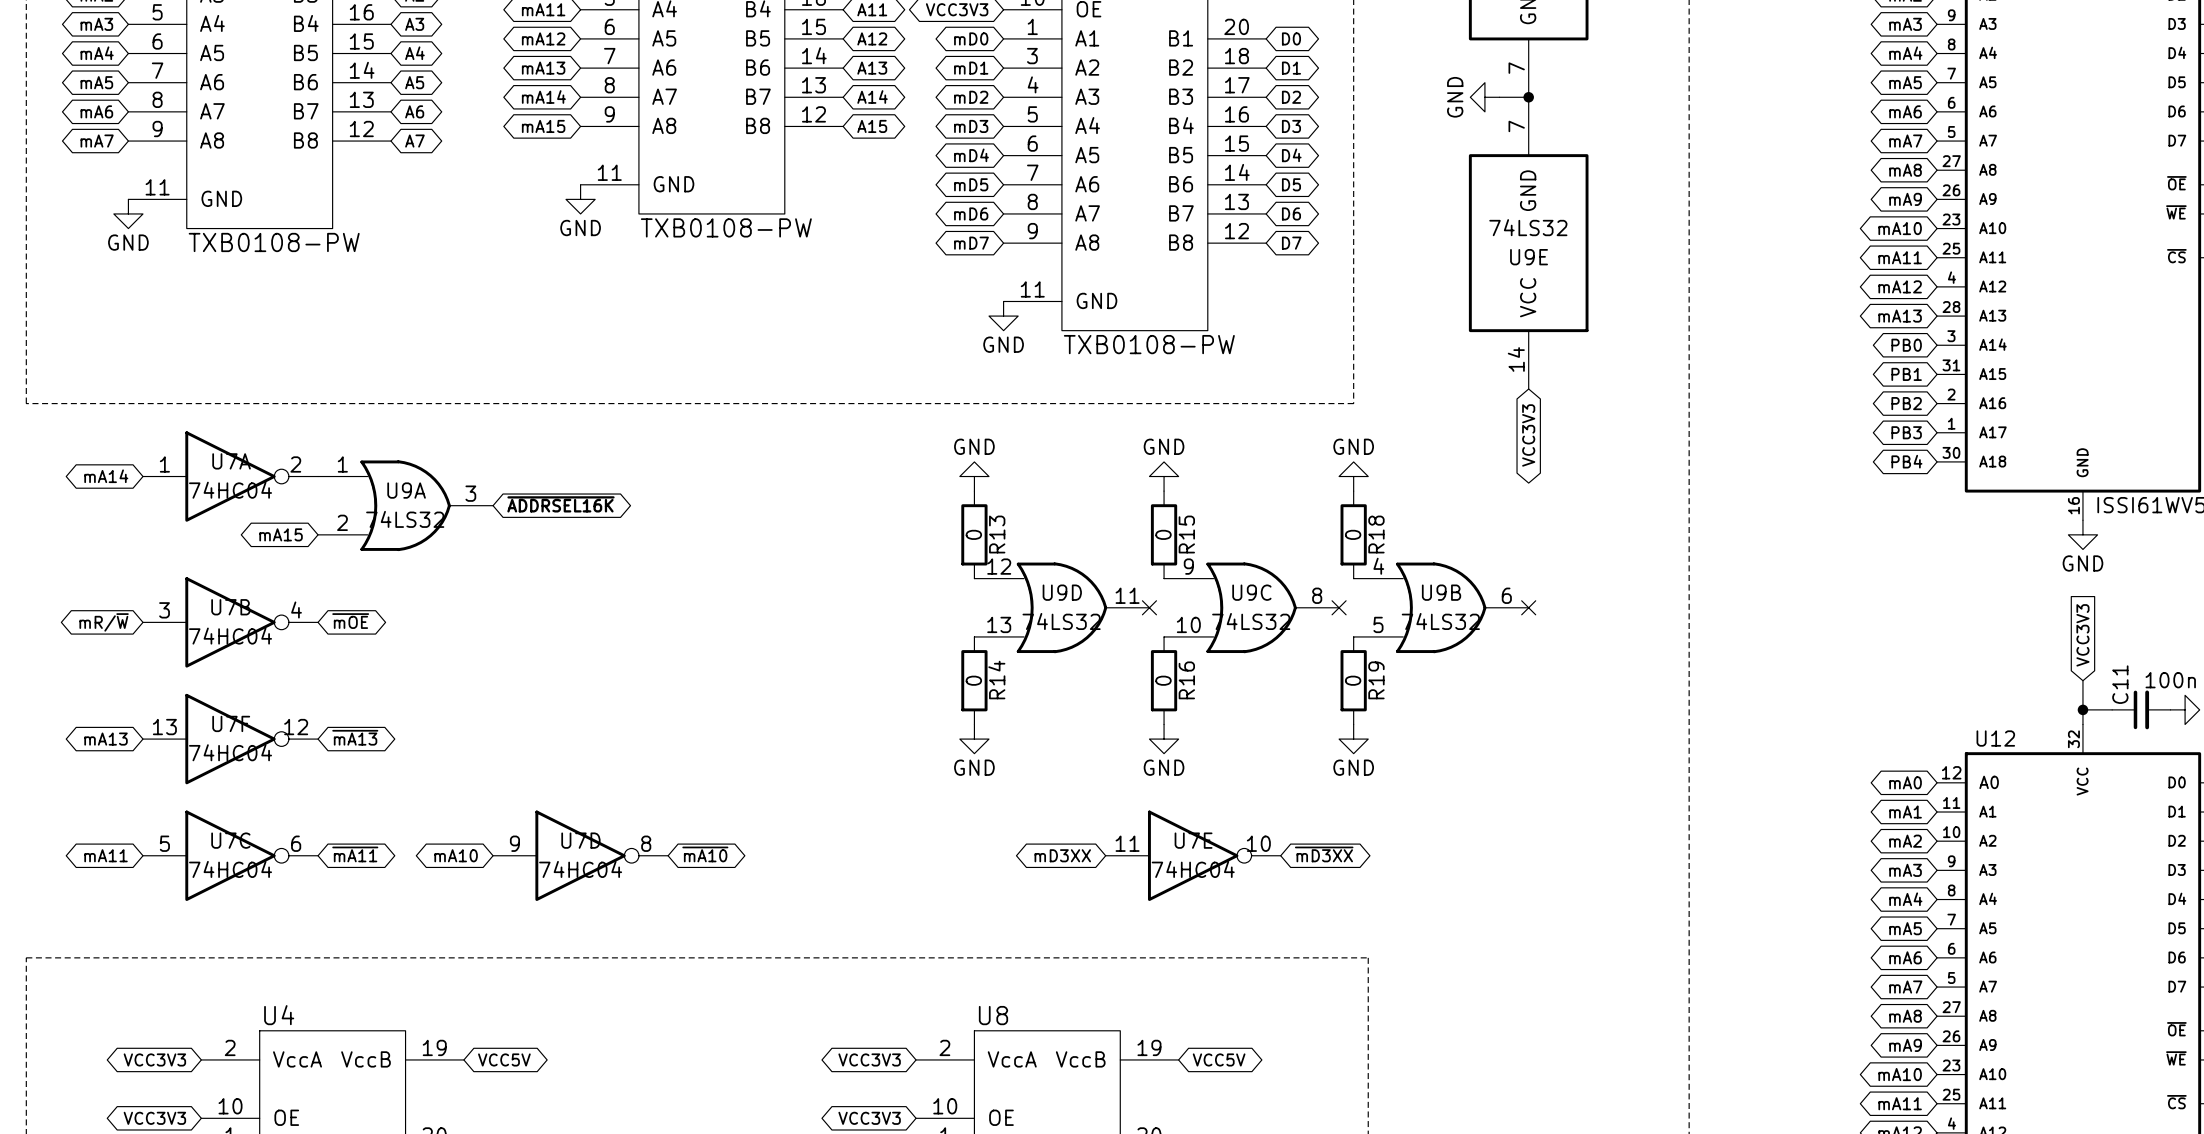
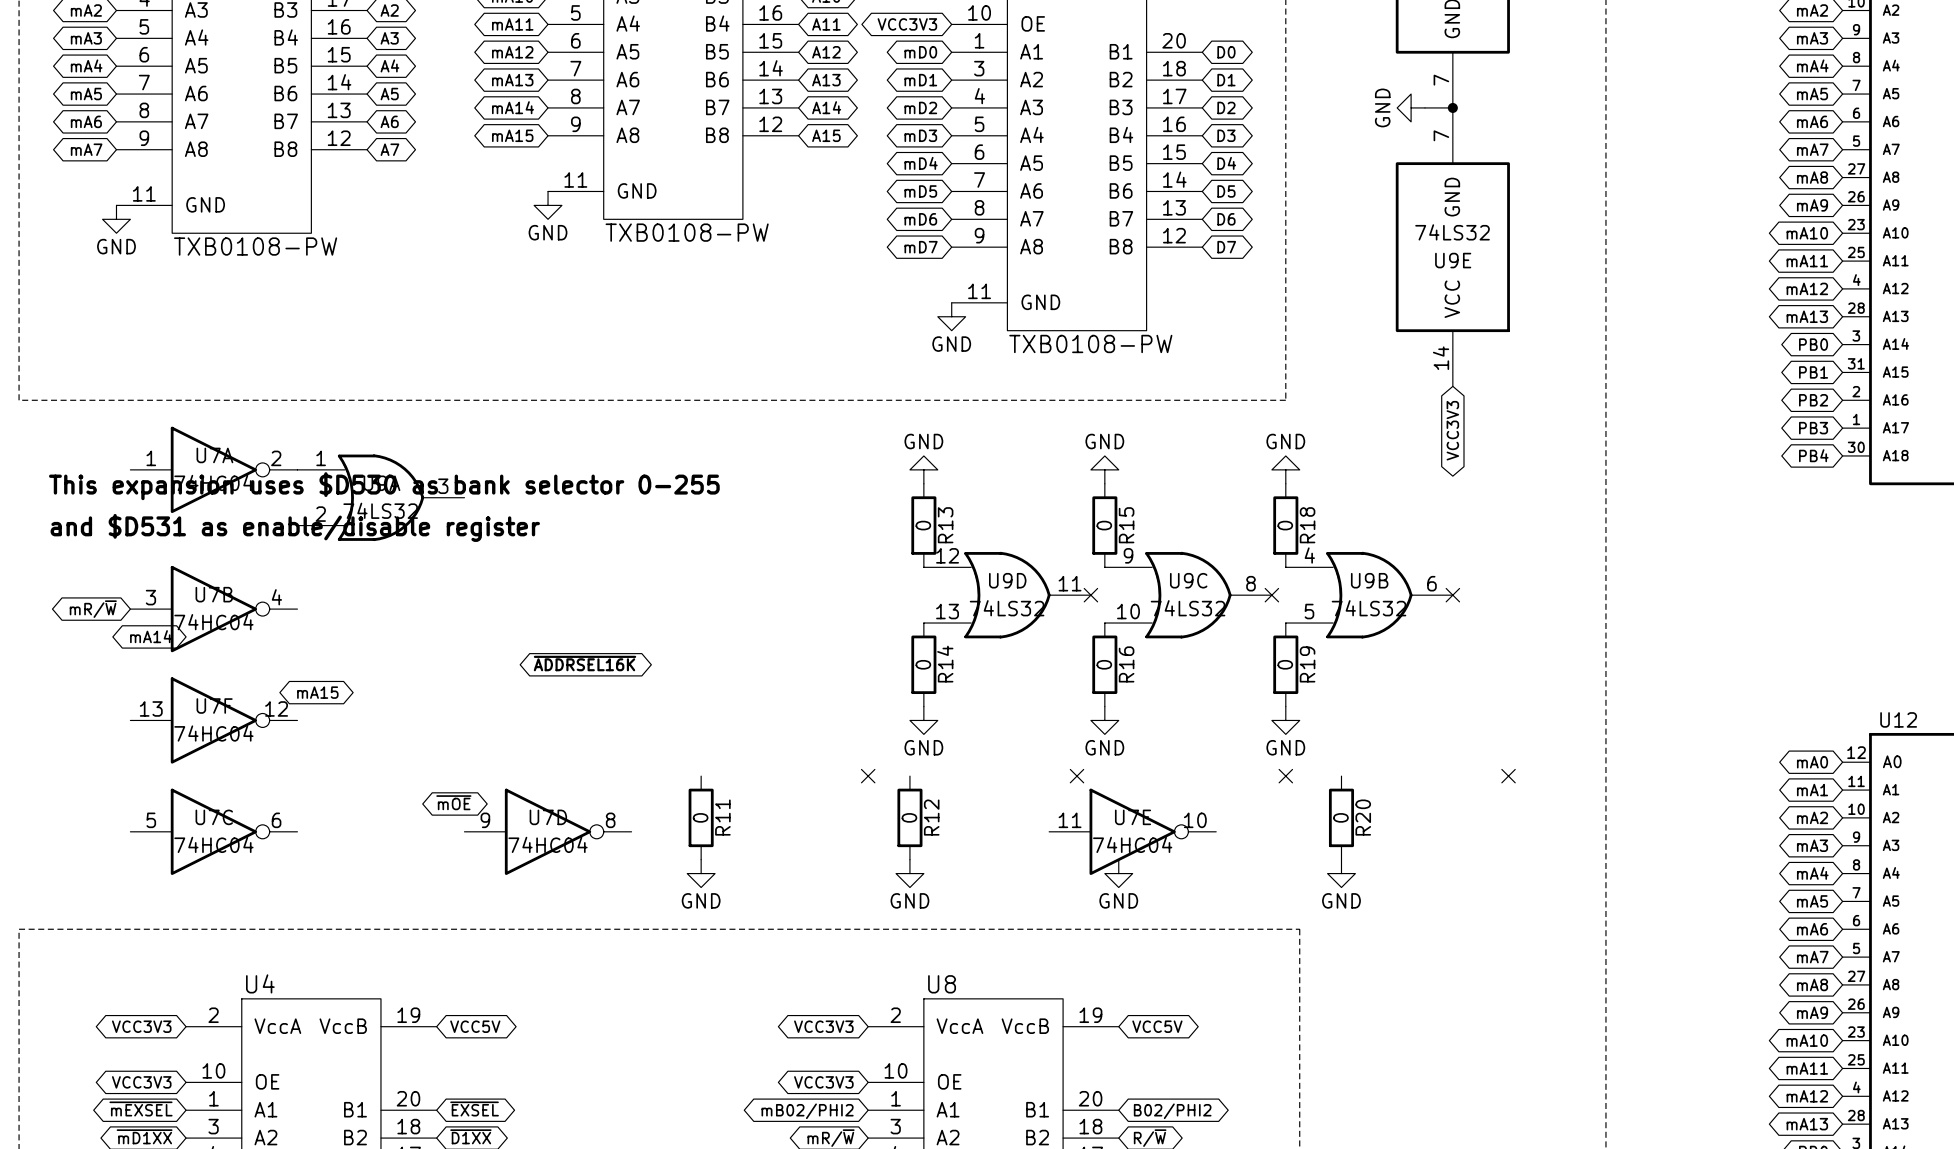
global label position: mA14 (106, 476) -> mA14 (151, 636)
text: none -> This expansion uses $D530 as bank selector 0-255 (384, 486)
global label position: ~{ADDRSEL16K} (560, 504) -> ~{ADDRSEL16K} (584, 663)
global label position: mA15 (281, 534) -> mA15 (317, 692)
text: none -> and $D531 as enable/disable register (295, 527)
global label position: ~{mOE} (350, 621) -> ~{mOE} (453, 802)
global label: ~{mA13} (355, 737) -> none
global label: mA13 (106, 739) -> none
no-connect mark: none -> (868, 776)
no-connect mark: none -> (1077, 776)
no-connect mark: none -> (1285, 776)
no-connect mark: none -> (1508, 776)
R11: none -> 0 (701, 817)
R12: none -> 0 (909, 817)
R20: none -> 0 (1341, 817)
global label: ~{mA11} (355, 854) -> none
global label: ~{mA10} (705, 854) -> none
global label: ~{mD3XX} (1324, 854) -> none
global label: mA11 (106, 855) -> none
global label: mA10 (456, 855) -> none
global label: mD3XX (1062, 855) -> none
power symbol: none -> GND (701, 873)
power symbol: none -> GND (909, 873)
power symbol: none -> GND (1118, 873)
power symbol: none -> GND (1341, 873)

